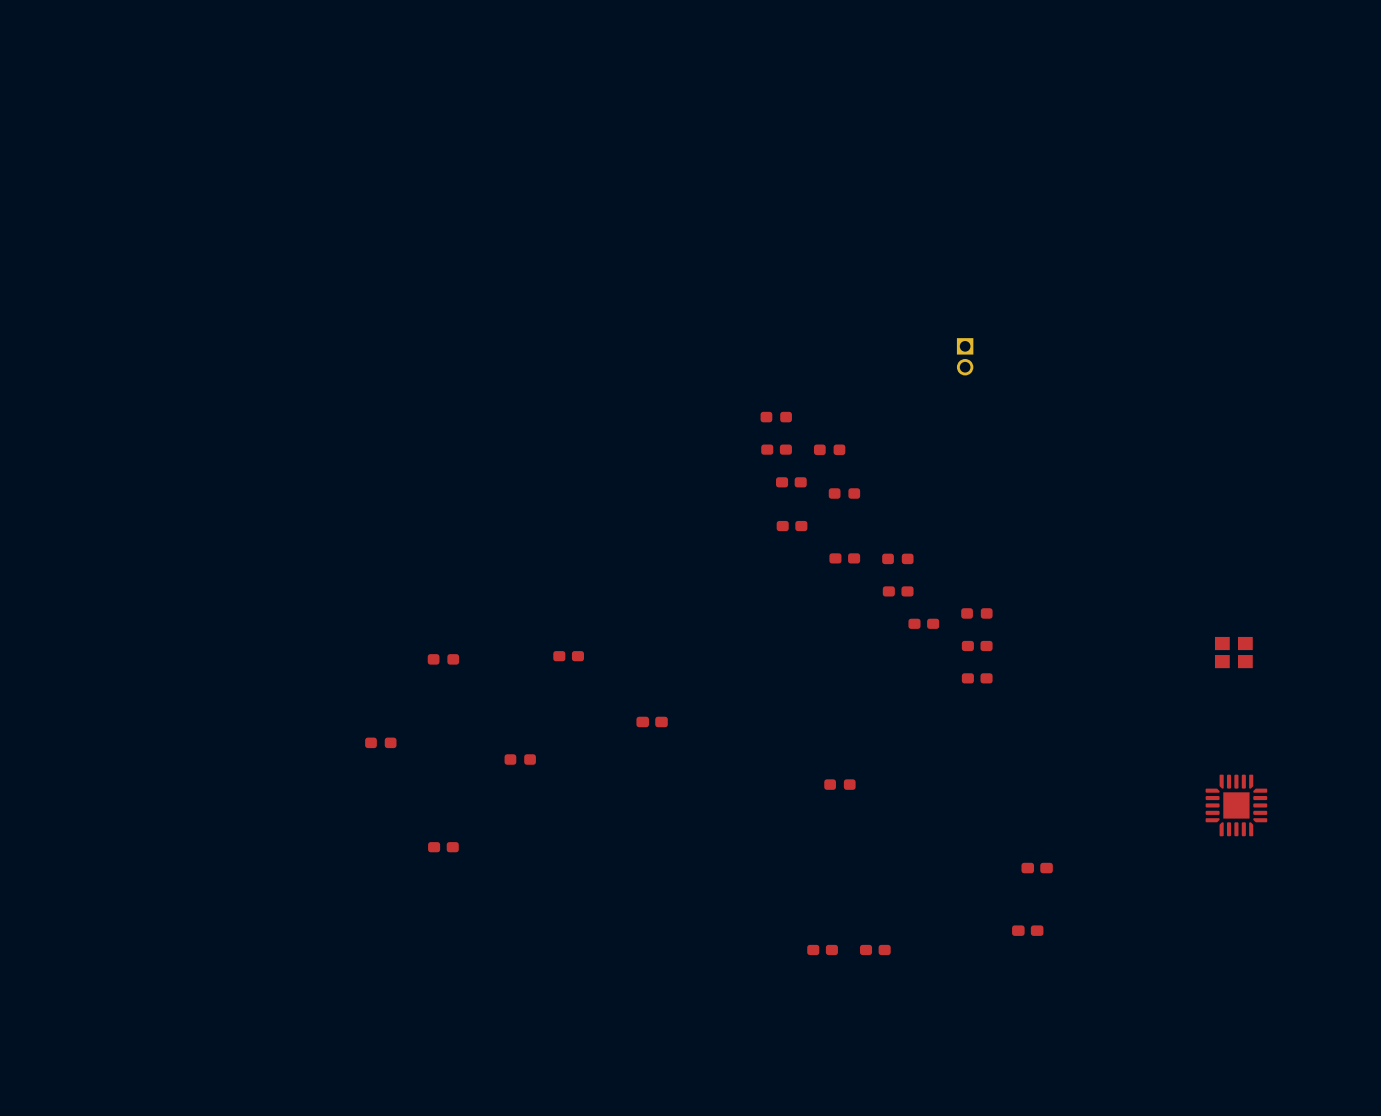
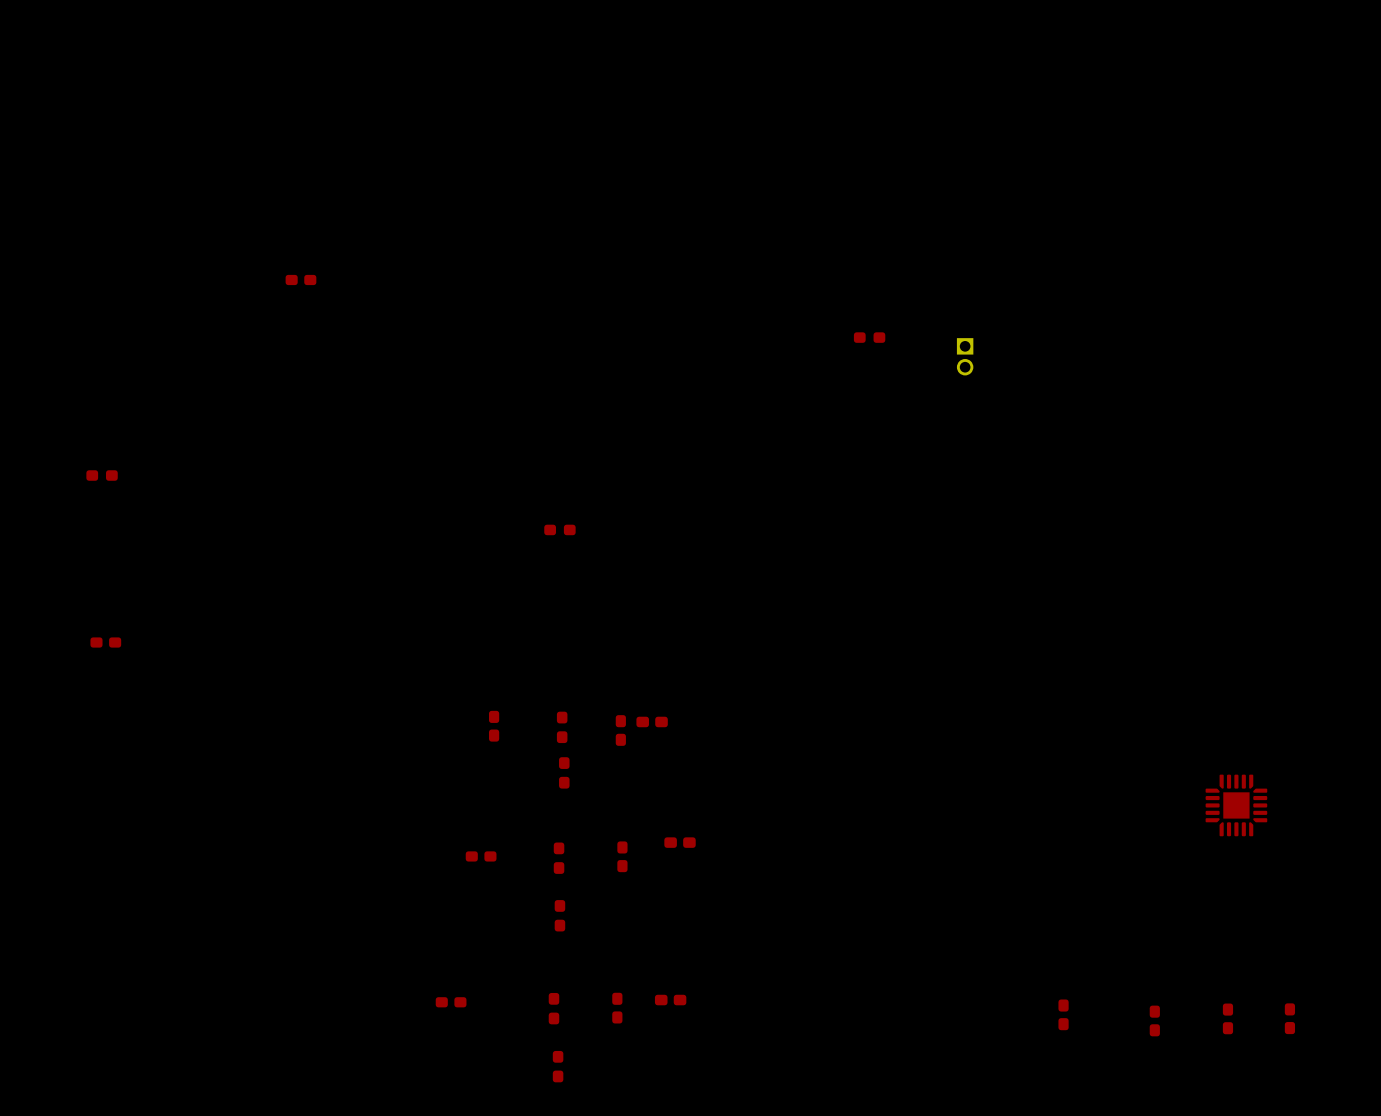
part: none -> (300, 279)
part: none -> (869, 337)
part: (776, 417) -> none
part: (776, 449) -> none
part: (829, 449) -> none
part: none -> (102, 475)
part: (791, 482) -> none
part: (844, 493) -> none
part: (792, 526) -> none
part: none -> (559, 529)
part: (844, 558) -> none
part: (897, 558) -> none
part: (898, 591) -> none
part: (976, 613) -> none
part: (923, 623) -> none
part: none -> (105, 642)
part: (977, 645) -> none
part: (1233, 652) -> none
part: (568, 656) -> none
part: (443, 659) -> none
part: (977, 678) -> none
part: none -> (494, 726)
part: none -> (562, 727)
part: none -> (620, 730)
part: (380, 742) -> none
part: (520, 759) -> none
part: none -> (564, 772)
part: (839, 784) -> none
part: none -> (680, 842)
part position: (443, 847) -> (481, 856)
part: none -> (622, 856)
part: none -> (559, 858)
part: (1037, 868) -> none
part: none -> (559, 915)
part: (1027, 930) -> none
part: (822, 949) -> none
part: (875, 949) -> none
part: none -> (670, 1000)
part: none -> (451, 1002)
part: none -> (553, 1008)
part: none -> (617, 1008)
part: none -> (1063, 1014)
part: none -> (1227, 1018)
part: none -> (1289, 1018)
part: none -> (1154, 1020)
part: none -> (558, 1066)

